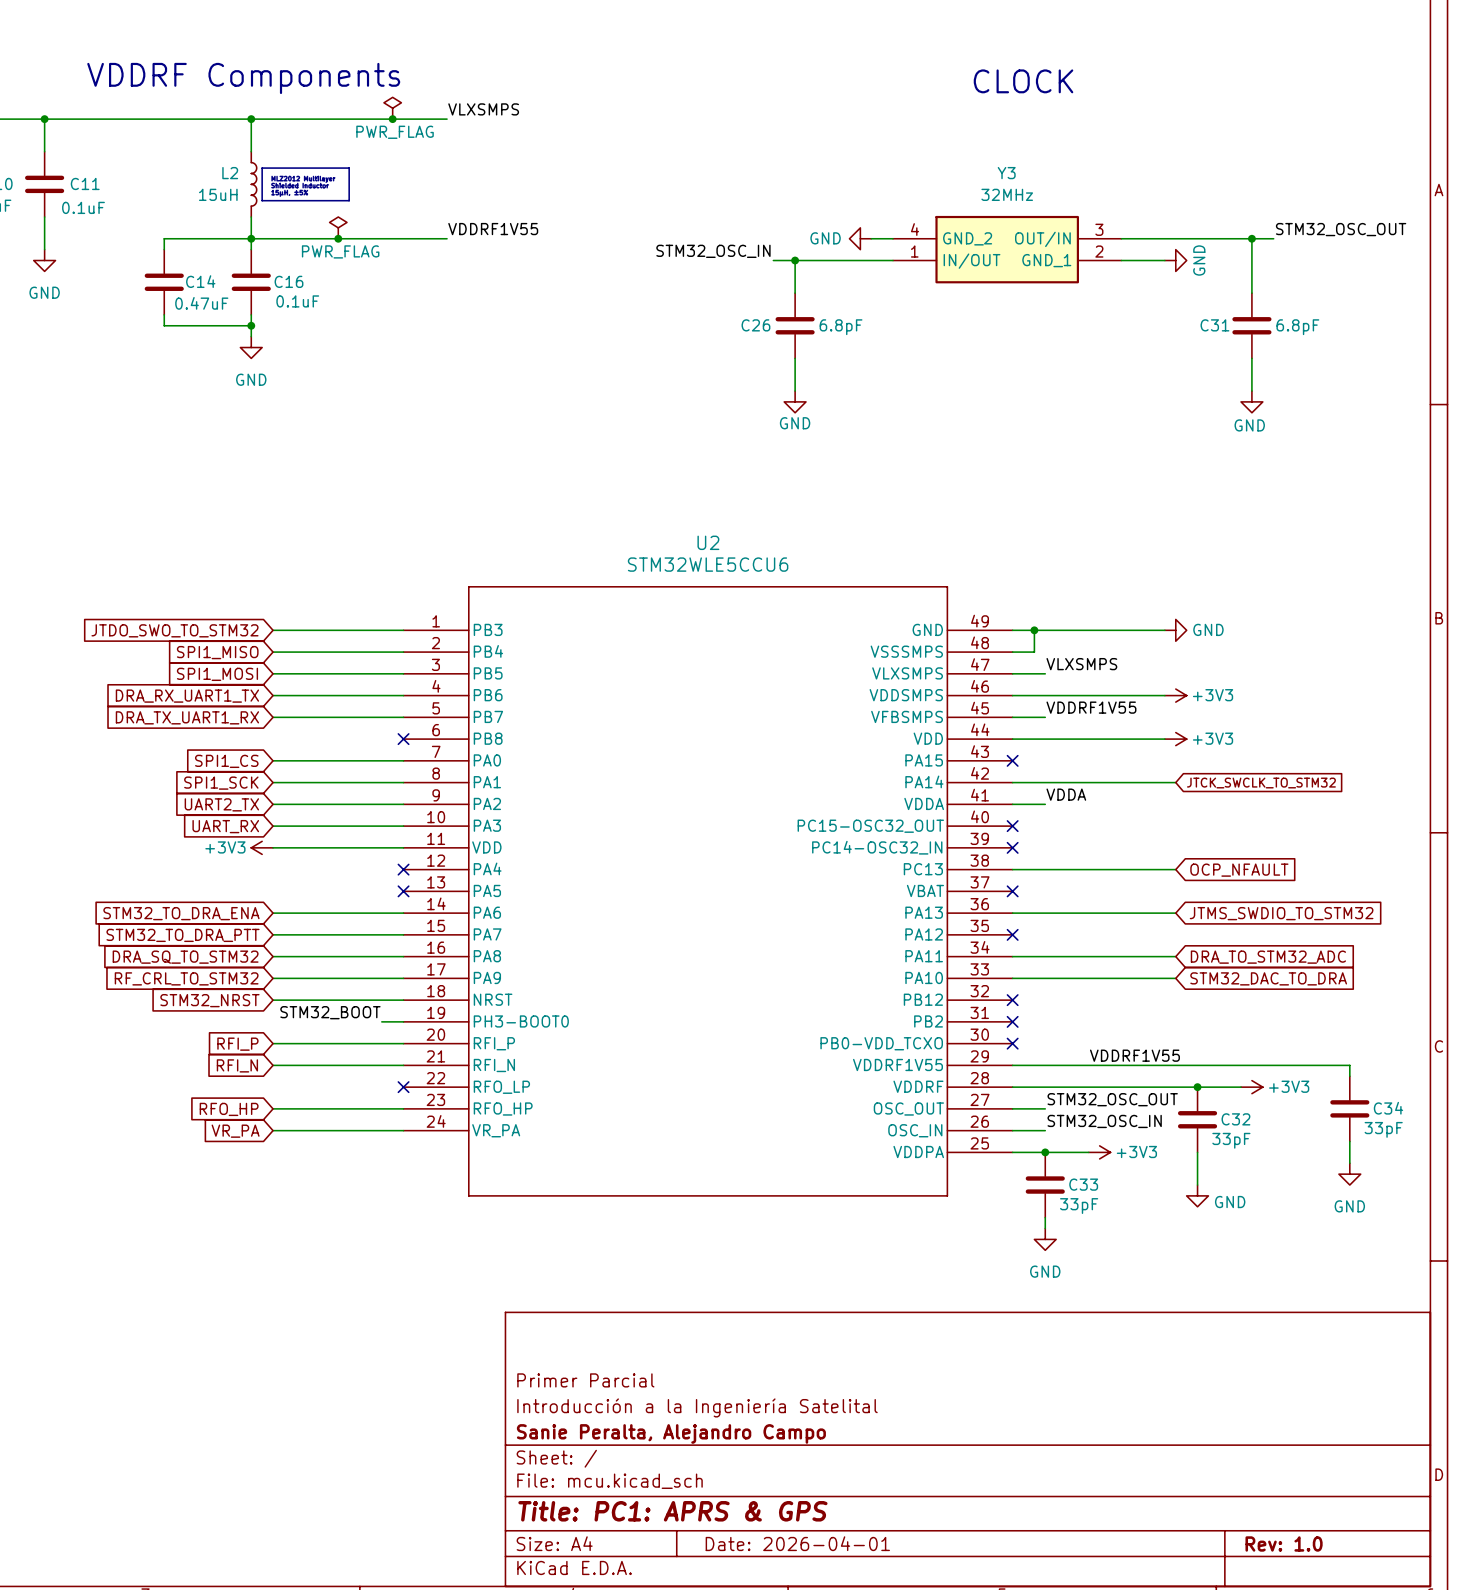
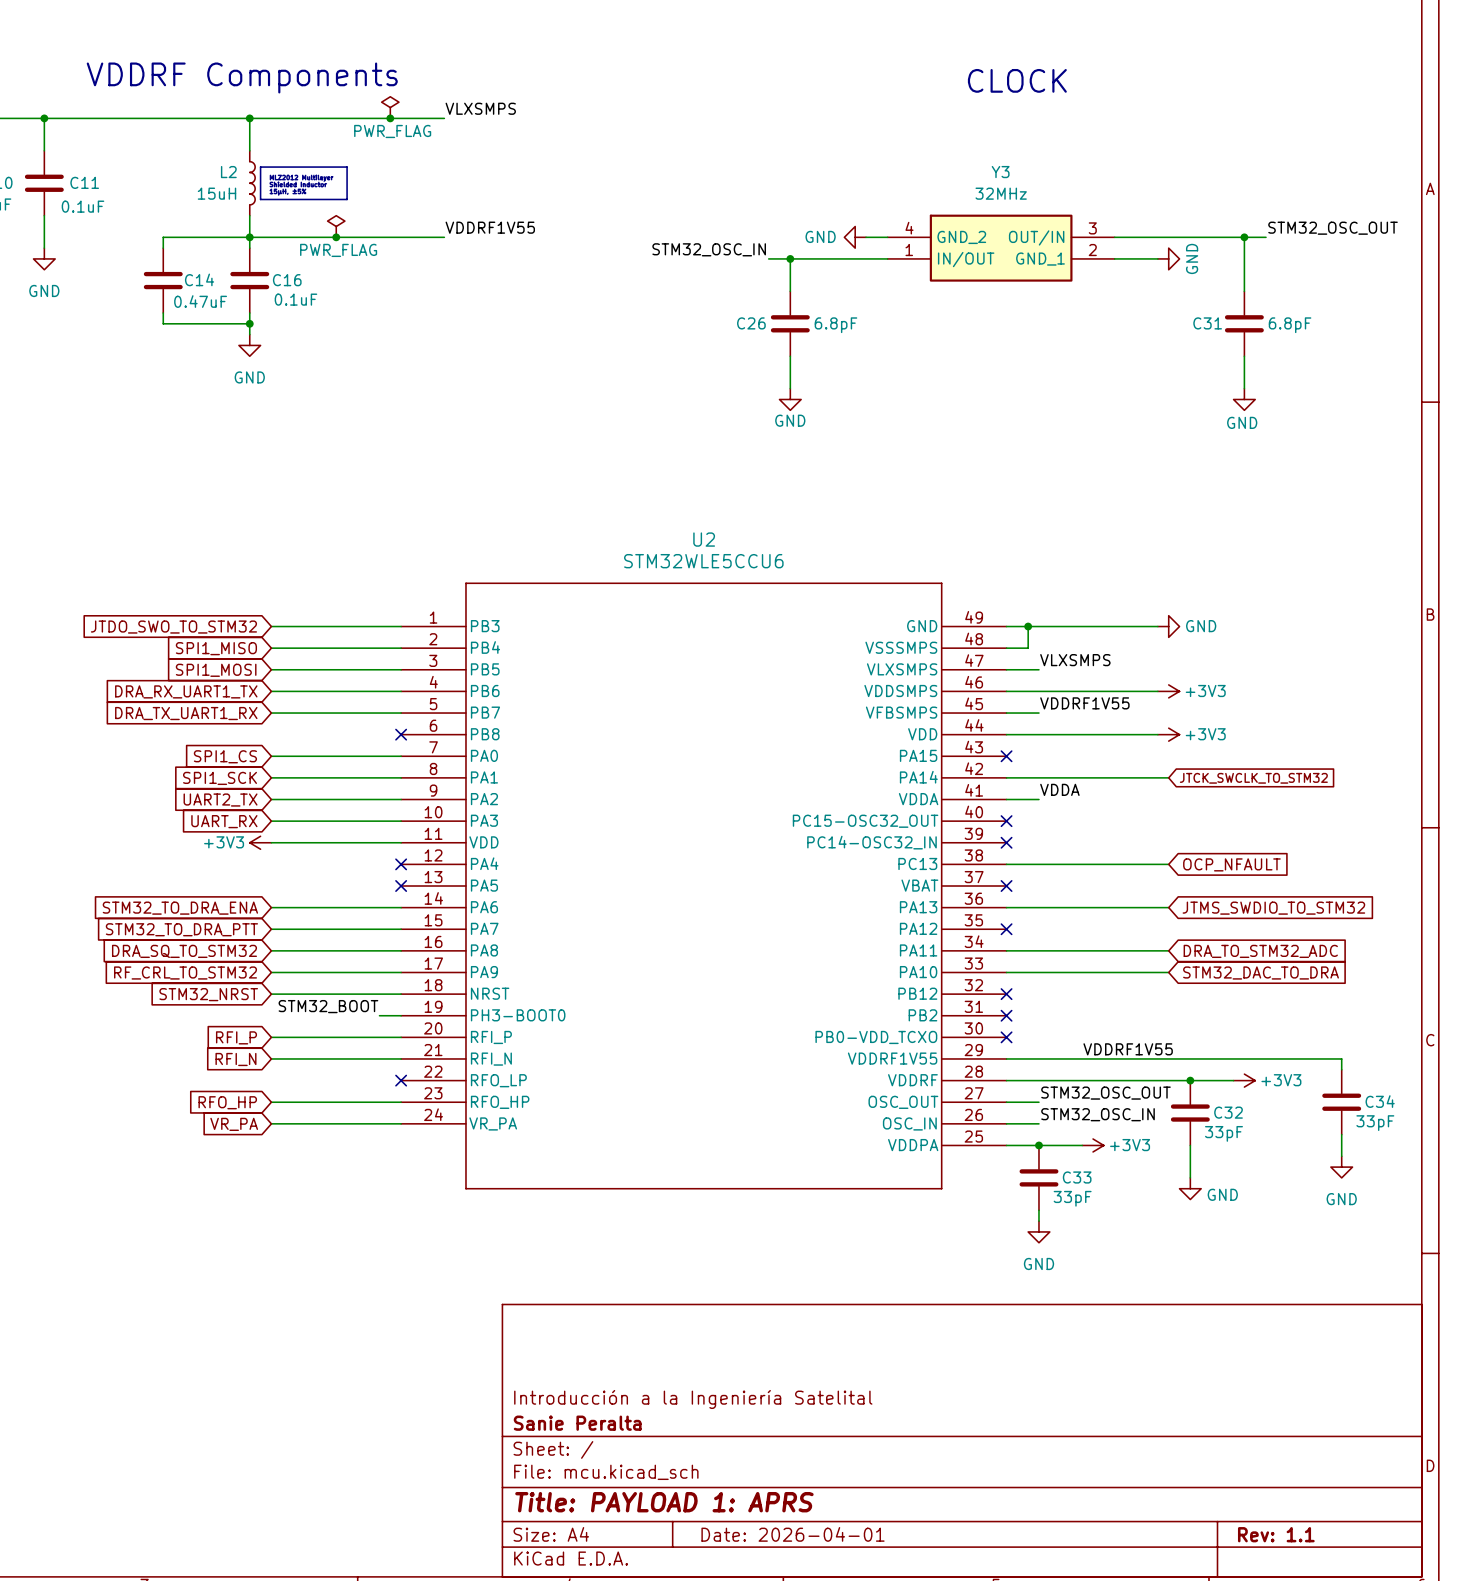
title block: Primer Parcial (585, 1380) -> none
title block: Sanie Peralta, Alejandro Campo (671, 1433) -> Sanie Peralta (577, 1423)
title block: Title: PC1: APRS & GPS (672, 1511) -> Title: PAYLOAD 1: APRS (664, 1502)
title block: Rev: 1.0 (1284, 1543) -> Rev: 1.1 (1276, 1534)

